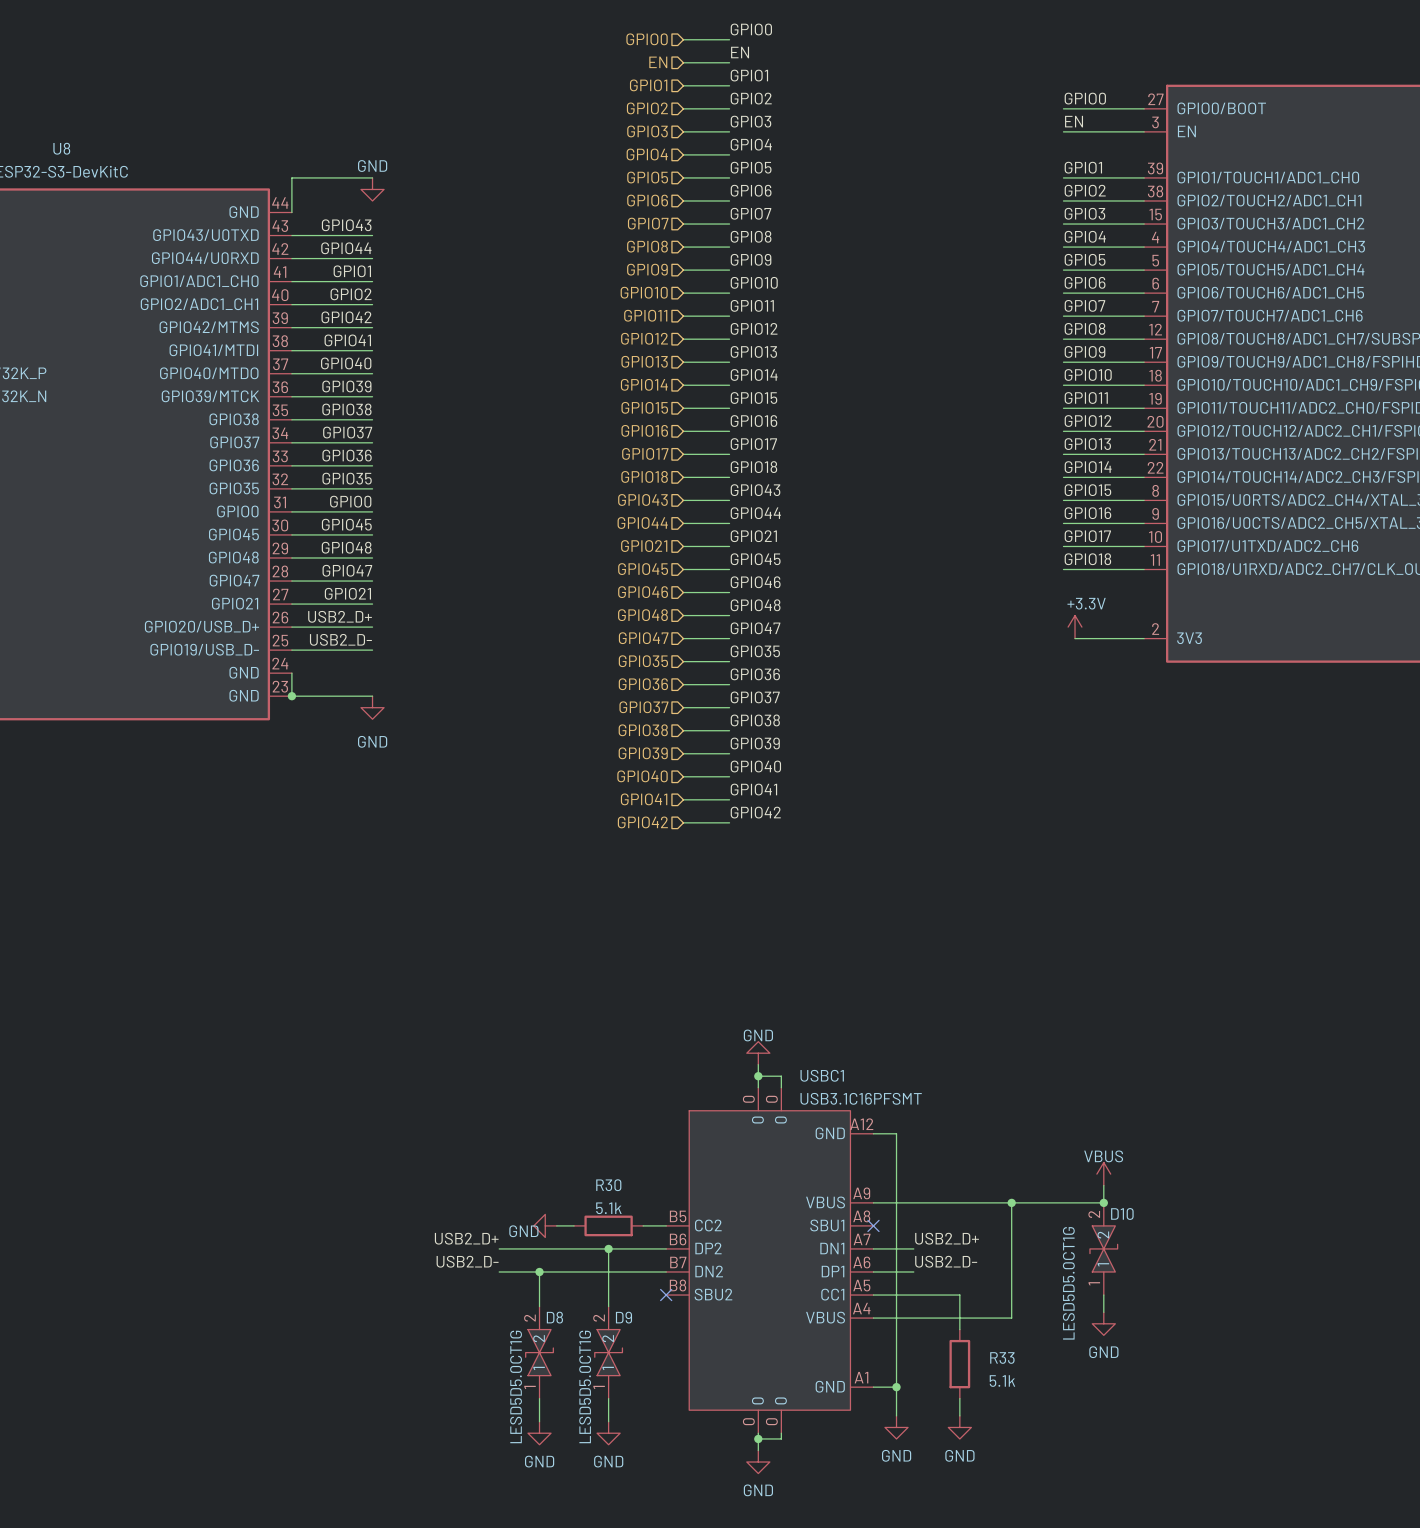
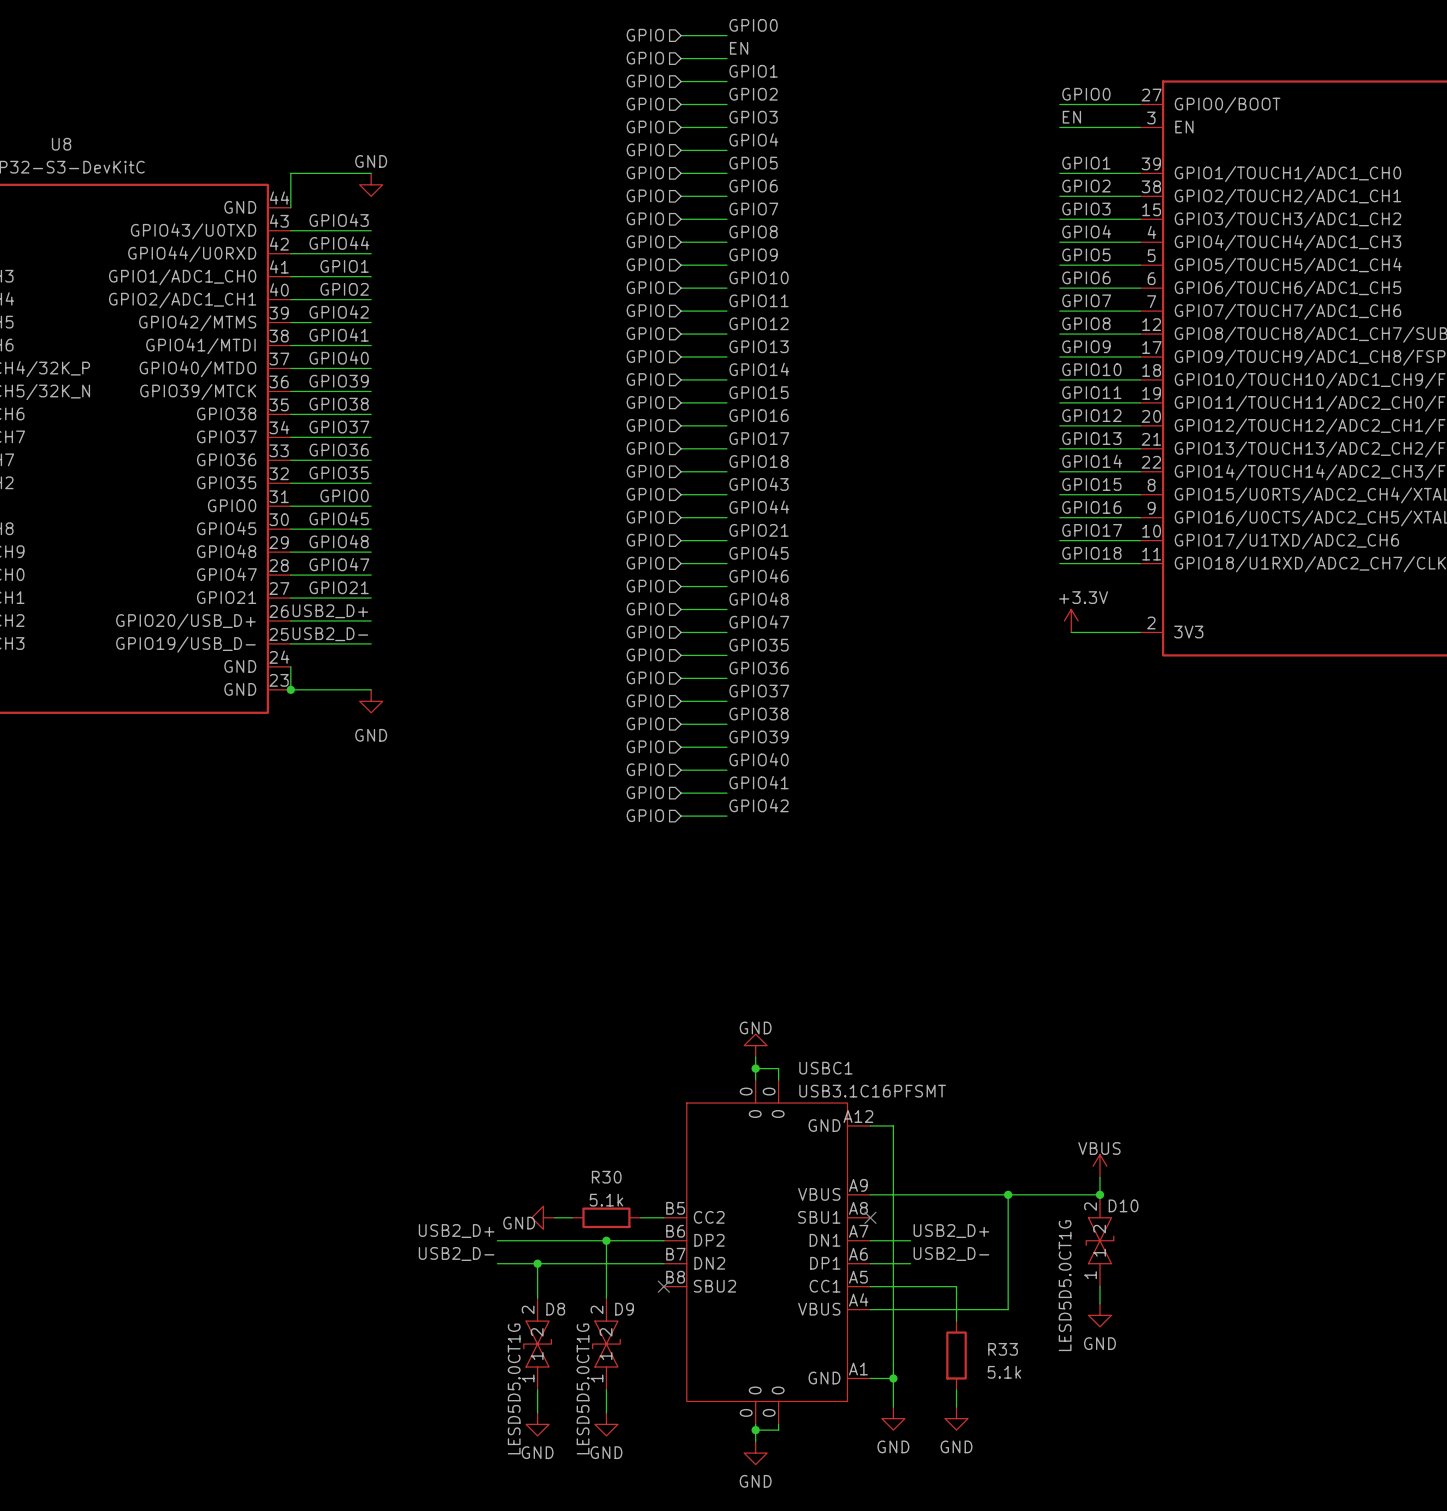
hierarchical label: GPIO0 (647, 39) -> GPIO (645, 35)
hierarchical label: EN (658, 62) -> GPIO (645, 58)
hierarchical label: GPIO1 (648, 85) -> GPIO (645, 81)
hierarchical label: GPIO2 (647, 108) -> GPIO (645, 104)
hierarchical label: GPIO3 (647, 131) -> GPIO (645, 127)
hierarchical label: GPIO4 (647, 154) -> GPIO (645, 149)
hierarchical label: GPIO5 (647, 177) -> GPIO (645, 172)
hierarchical label: GPIO6 (647, 200) -> GPIO (645, 195)
hierarchical label: GPIO7 (648, 223) -> GPIO (645, 218)
hierarchical label: GPIO8 (647, 246) -> GPIO (645, 241)
hierarchical label: GPIO9 (647, 269) -> GPIO (645, 264)
hierarchical label: GPIO10 (644, 292) -> GPIO (645, 287)
hierarchical label: GPIO11 (645, 315) -> GPIO (645, 310)
hierarchical label: GPIO12 (644, 338) -> GPIO (645, 333)
hierarchical label: GPIO13 (644, 361) -> GPIO (645, 356)
hierarchical label: GPIO14 (644, 384) -> GPIO (645, 379)
hierarchical label: GPIO15 (644, 407) -> GPIO (645, 402)
hierarchical label: GPIO16 (644, 430) -> GPIO (645, 425)
hierarchical label: GPIO17 (645, 453) -> GPIO (645, 448)
hierarchical label: GPIO18 (644, 476) -> GPIO (645, 471)
hierarchical label: GPIO43 (642, 499) -> GPIO (645, 494)
hierarchical label: GPIO44 (642, 523) -> GPIO (645, 517)
hierarchical label: GPIO21 (644, 546) -> GPIO (645, 540)
hierarchical label: GPIO45 (643, 569) -> GPIO (645, 563)
hierarchical label: GPIO46 (643, 592) -> GPIO (645, 586)
hierarchical label: GPIO48 (642, 615) -> GPIO (645, 609)
hierarchical label: GPIO47 (643, 638) -> GPIO (645, 632)
hierarchical label: GPIO35 (643, 661) -> GPIO (645, 654)
hierarchical label: GPIO36 (643, 684) -> GPIO (645, 677)
hierarchical label: GPIO37 (643, 707) -> GPIO (645, 700)
hierarchical label: GPIO38 (643, 730) -> GPIO (645, 723)
hierarchical label: GPIO39 (643, 753) -> GPIO (645, 746)
hierarchical label: GPIO40 (642, 776) -> GPIO (645, 769)
hierarchical label: GPIO41 (644, 799) -> GPIO (645, 792)
hierarchical label: GPIO42 (642, 822) -> GPIO (645, 815)

